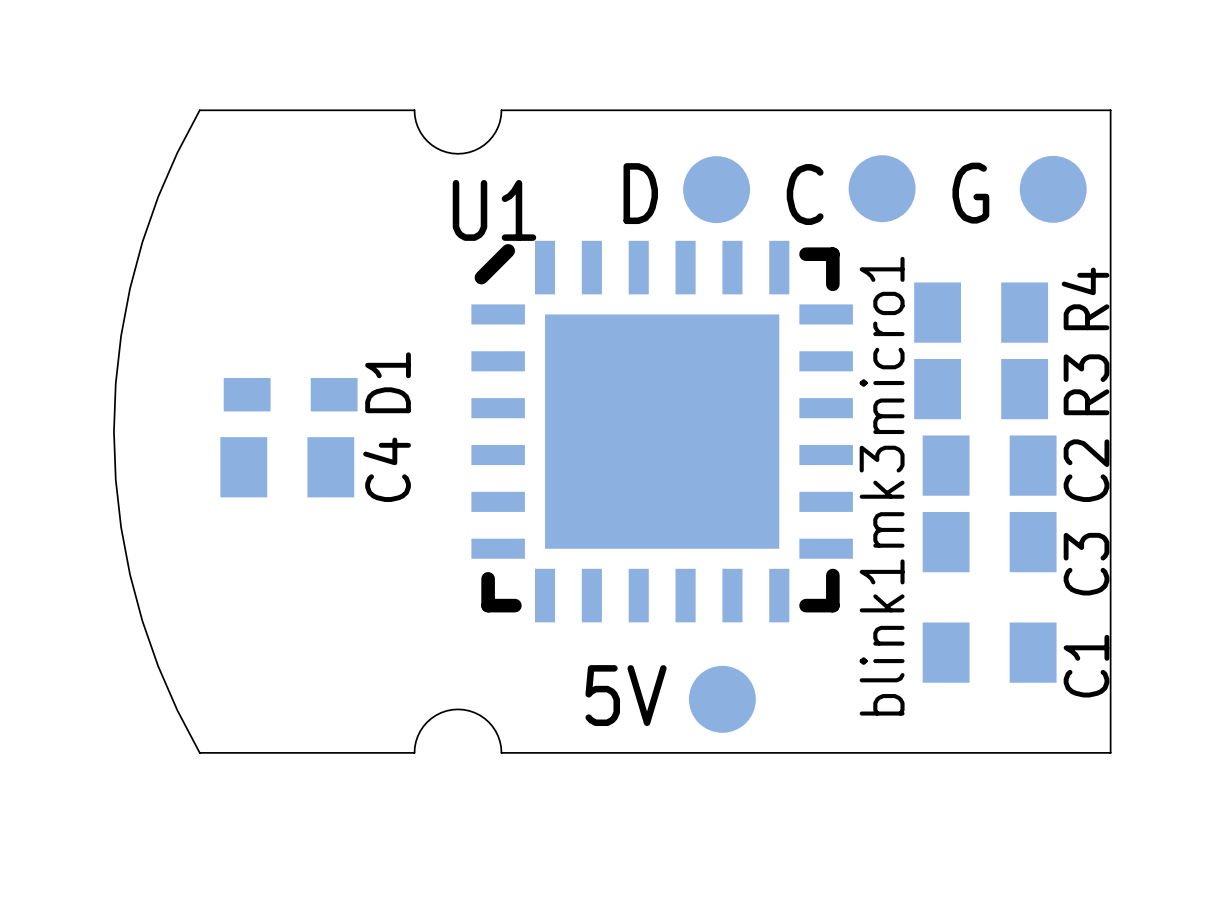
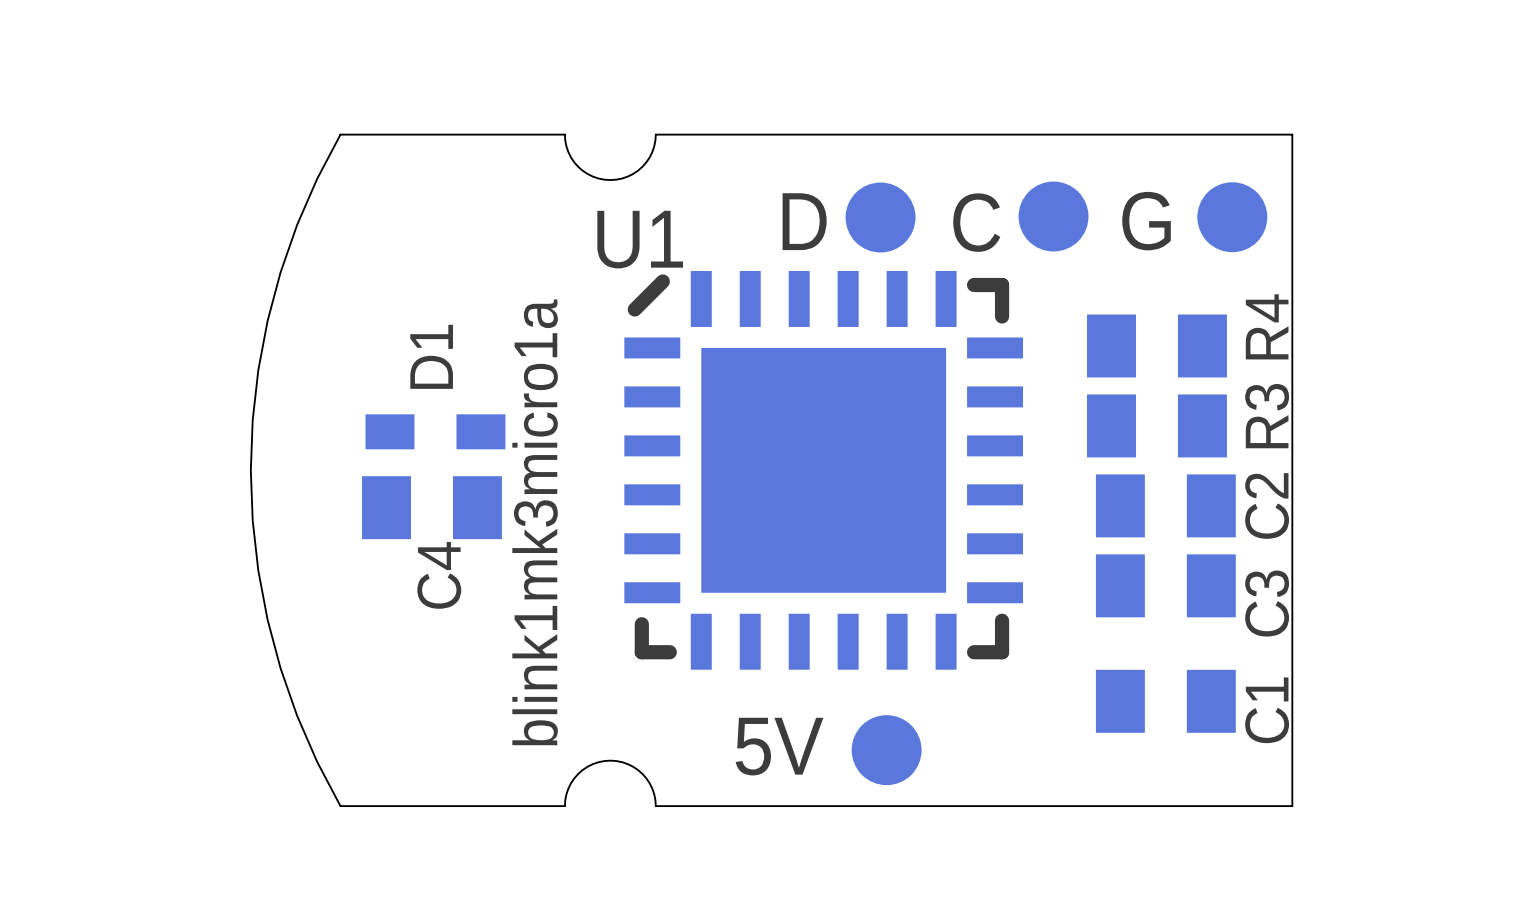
D1 name position: D1 (388, 382) -> D1 (431, 356)
text: none -> blink1mk3micro1a (535, 522)
C4 name position: C4 (387, 469) -> C4 (439, 575)
text: blink1mk3micro1 (882, 486) -> none

